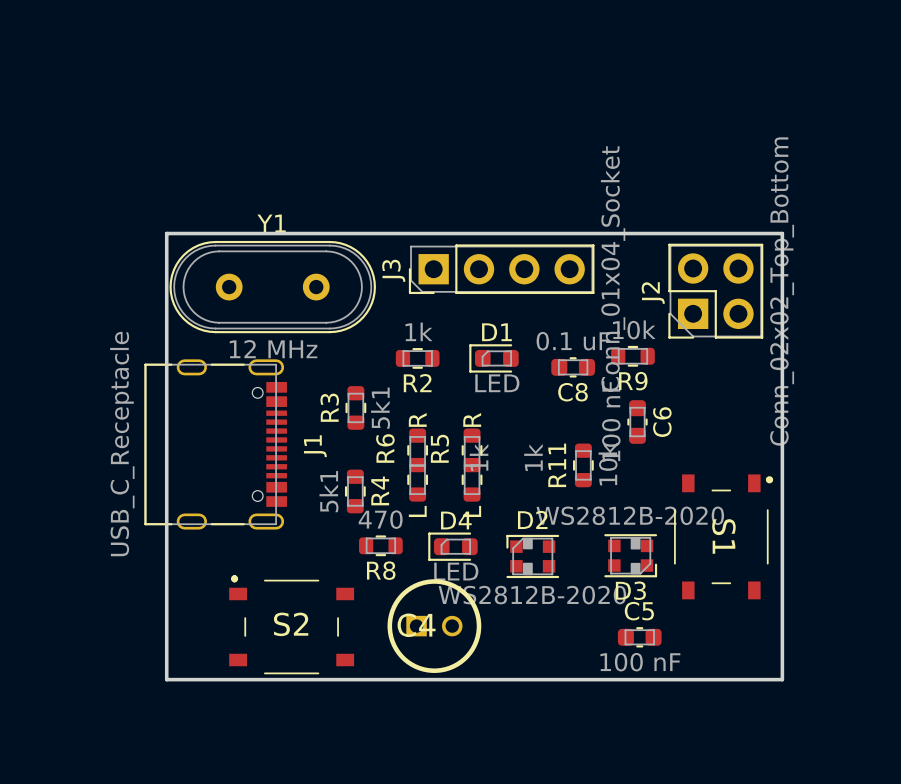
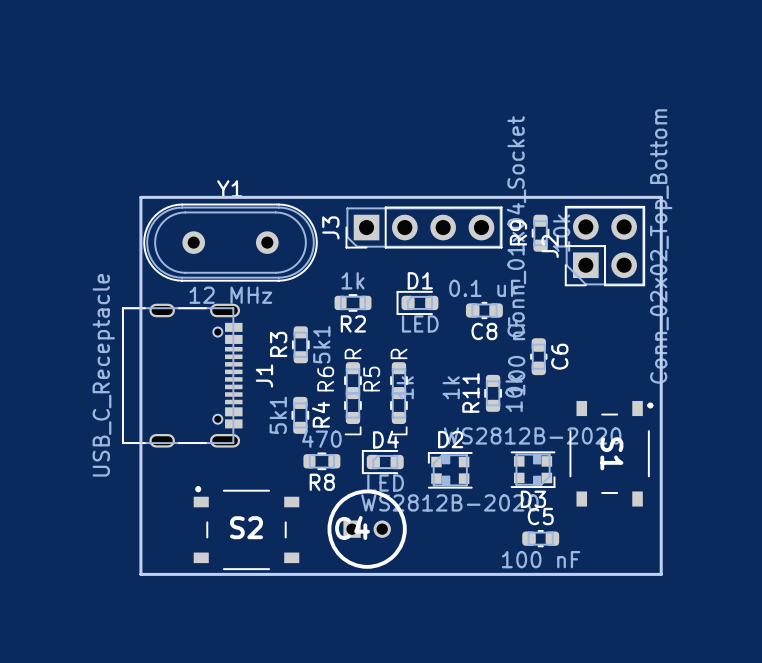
R9 rotation: 0° (632, 356) -> 90° clockwise (540, 233)
R9 position: (632, 356) -> (540, 233)

